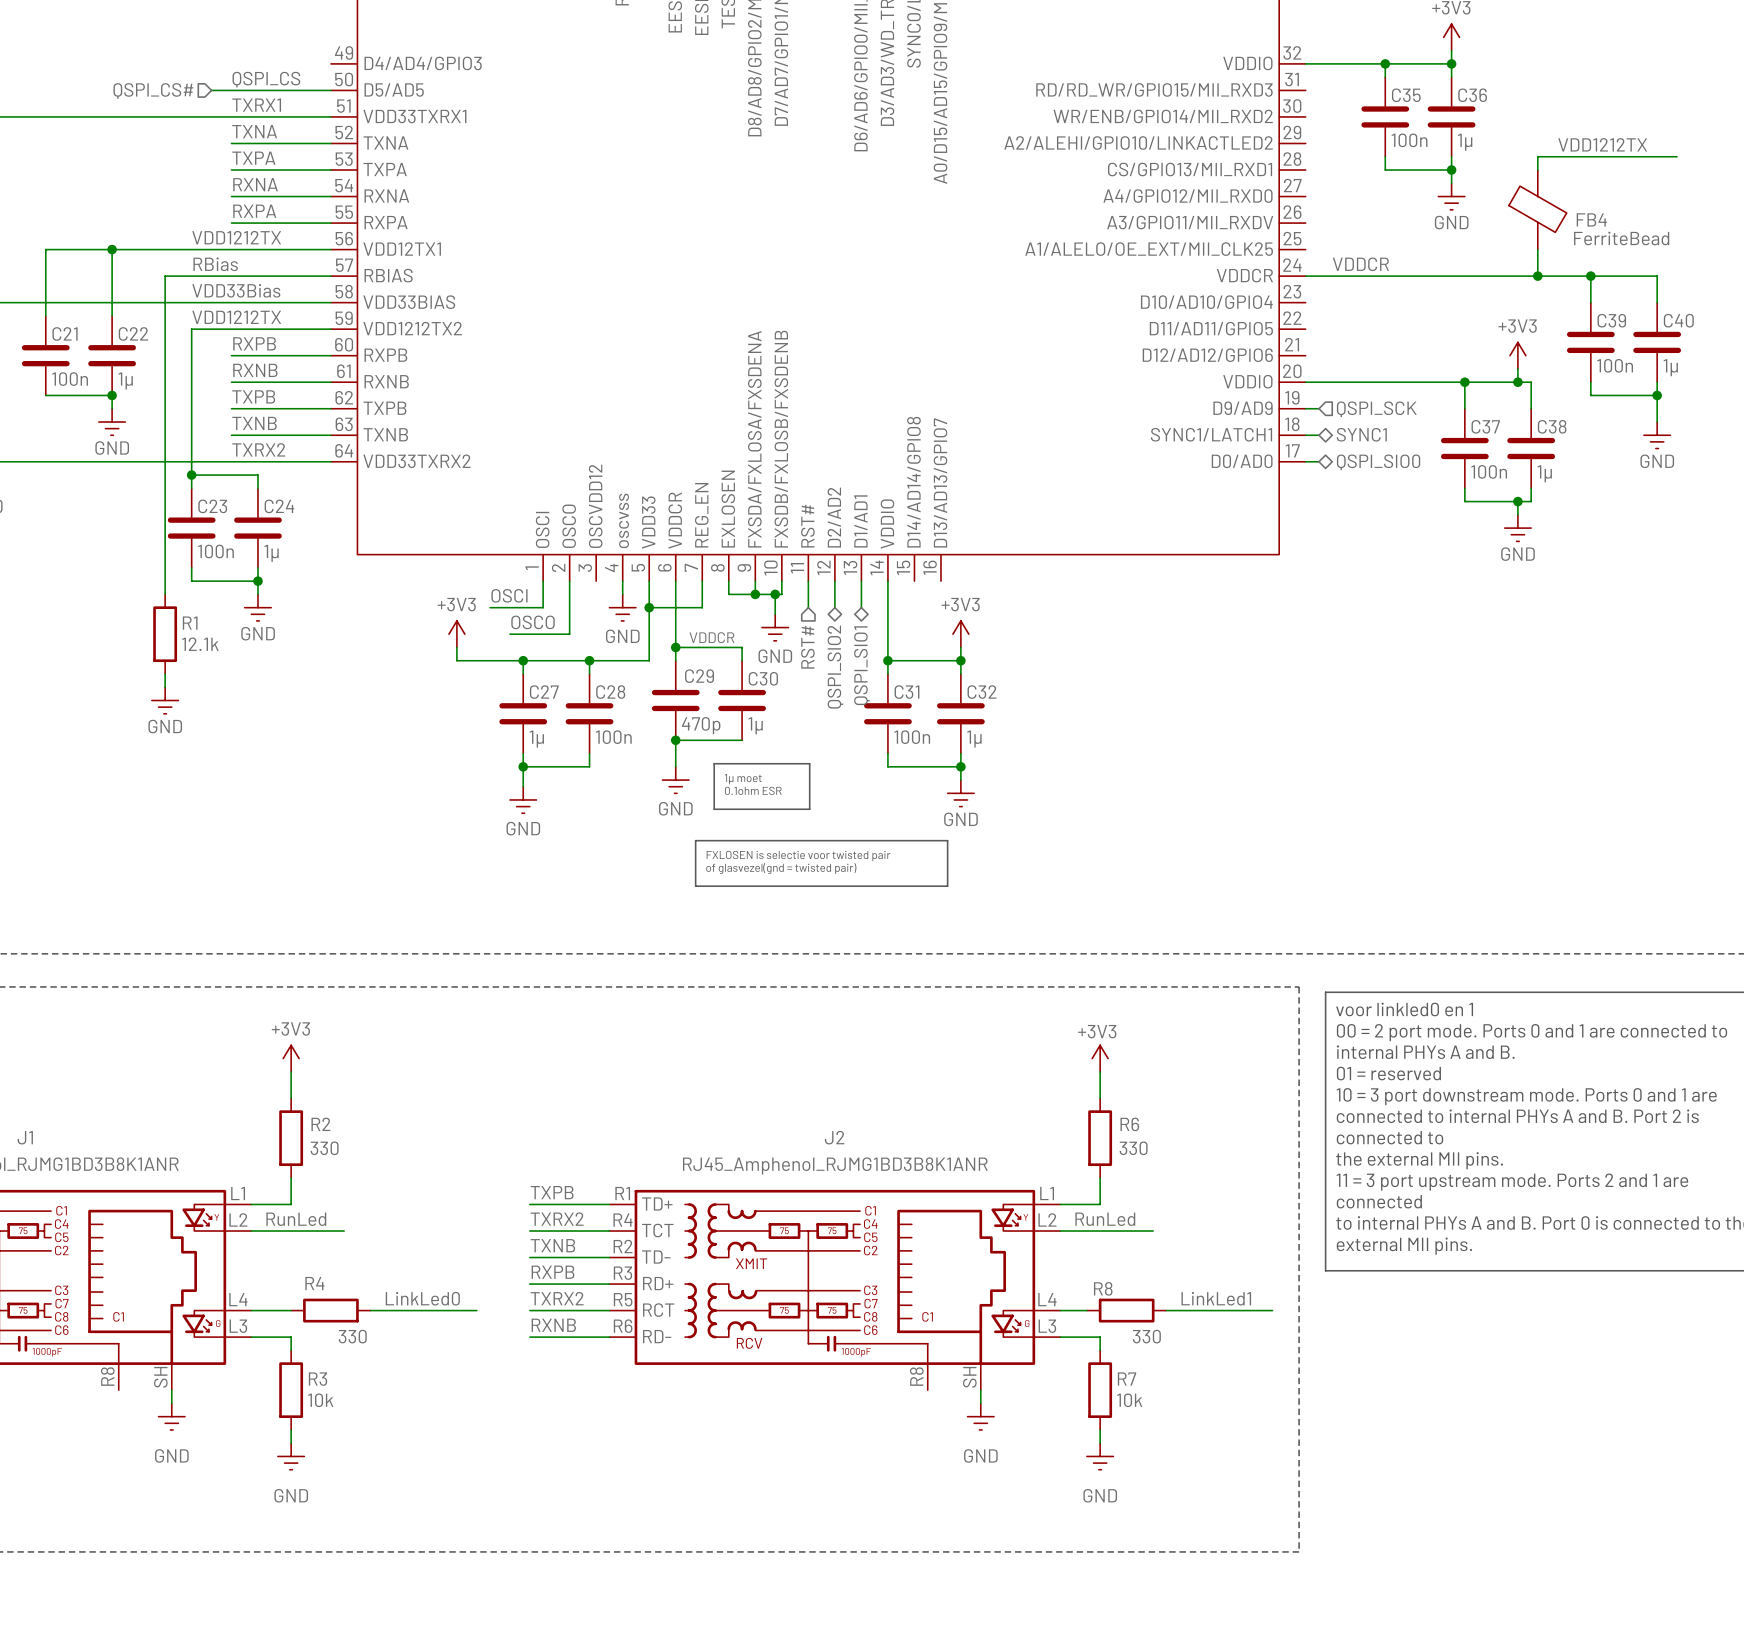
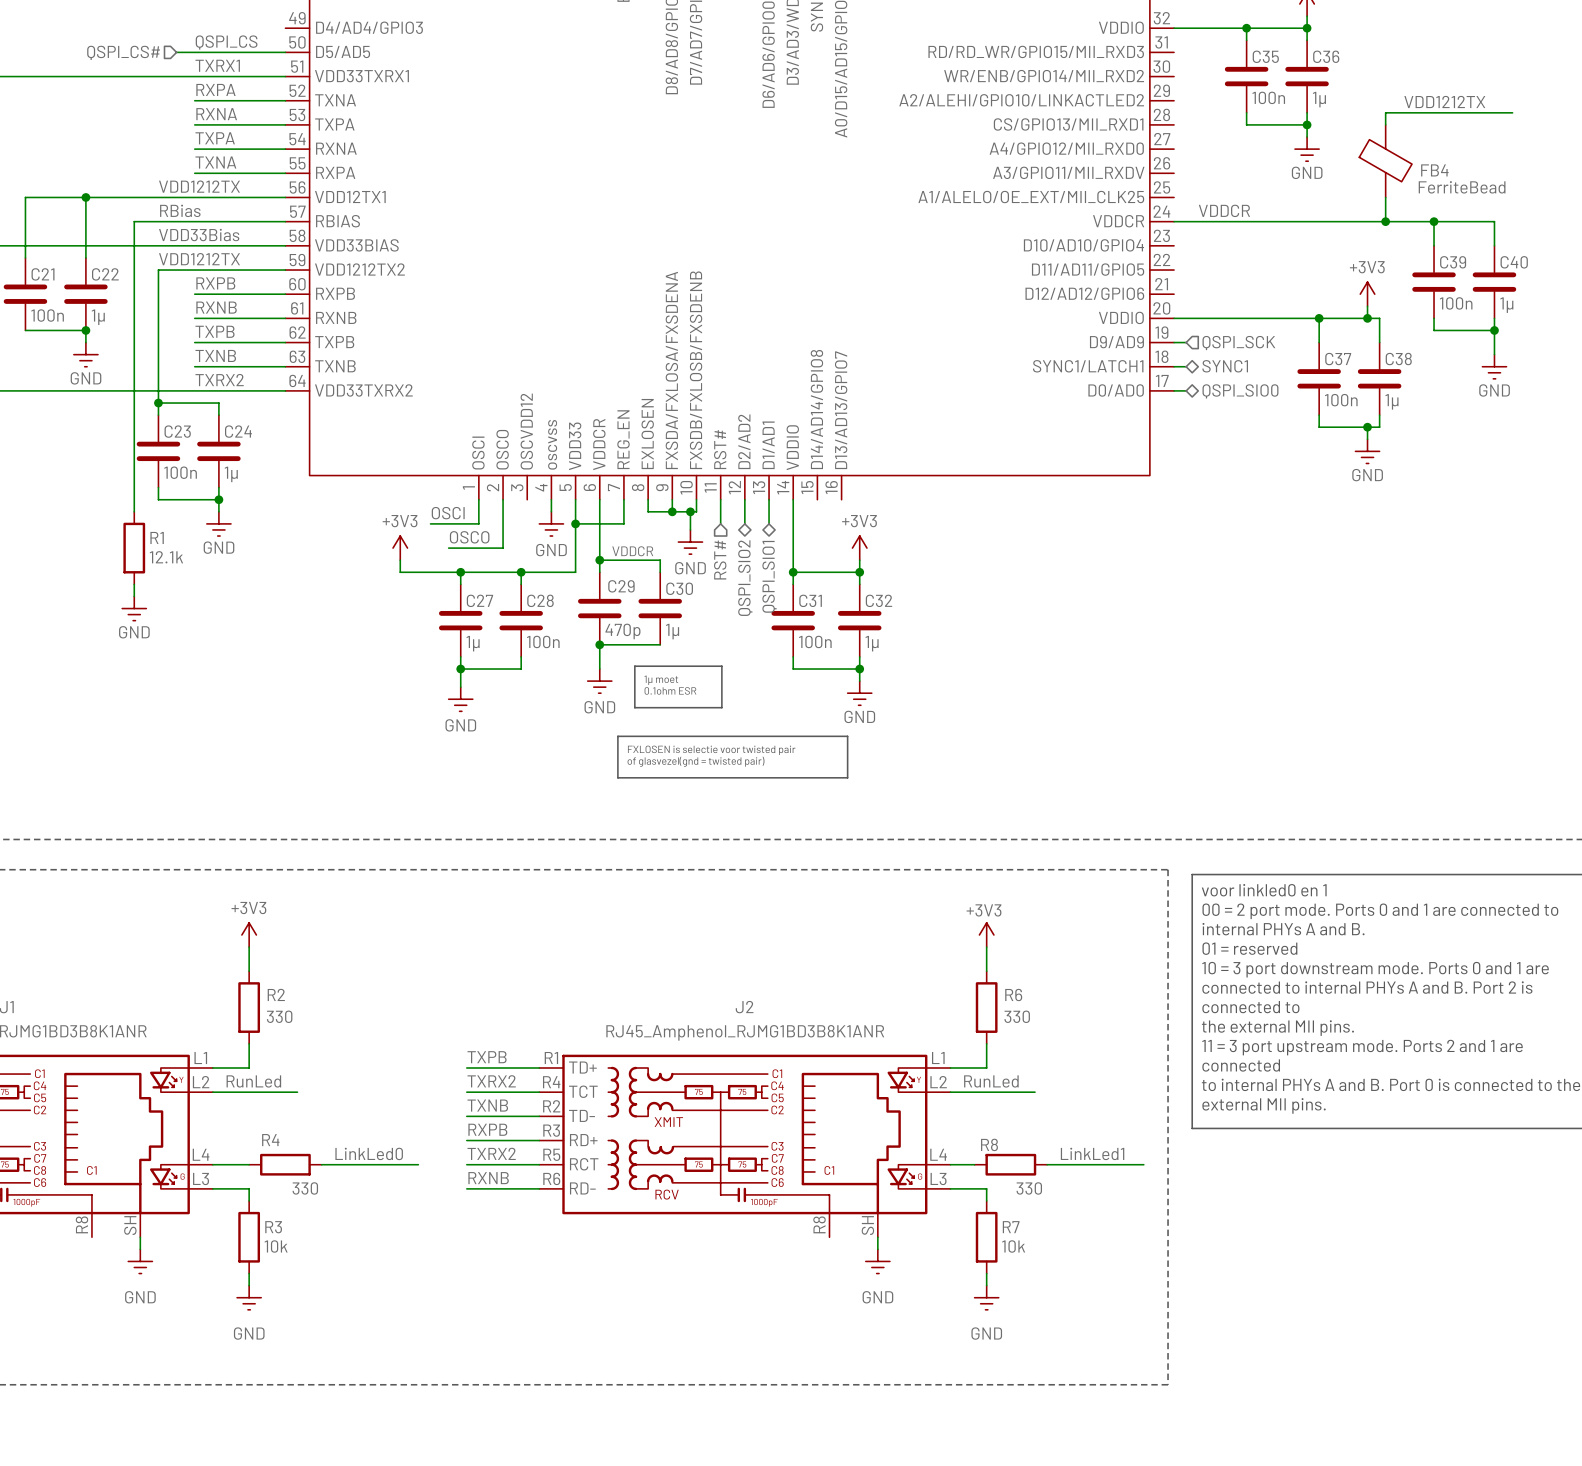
label: TXNA (254, 131) -> RXPA (215, 89)
label: TXPA (253, 158) -> RXNA (216, 114)
label: RXNA (255, 184) -> TXPA (215, 138)
label: RXPA (254, 211) -> TXNA (215, 162)

